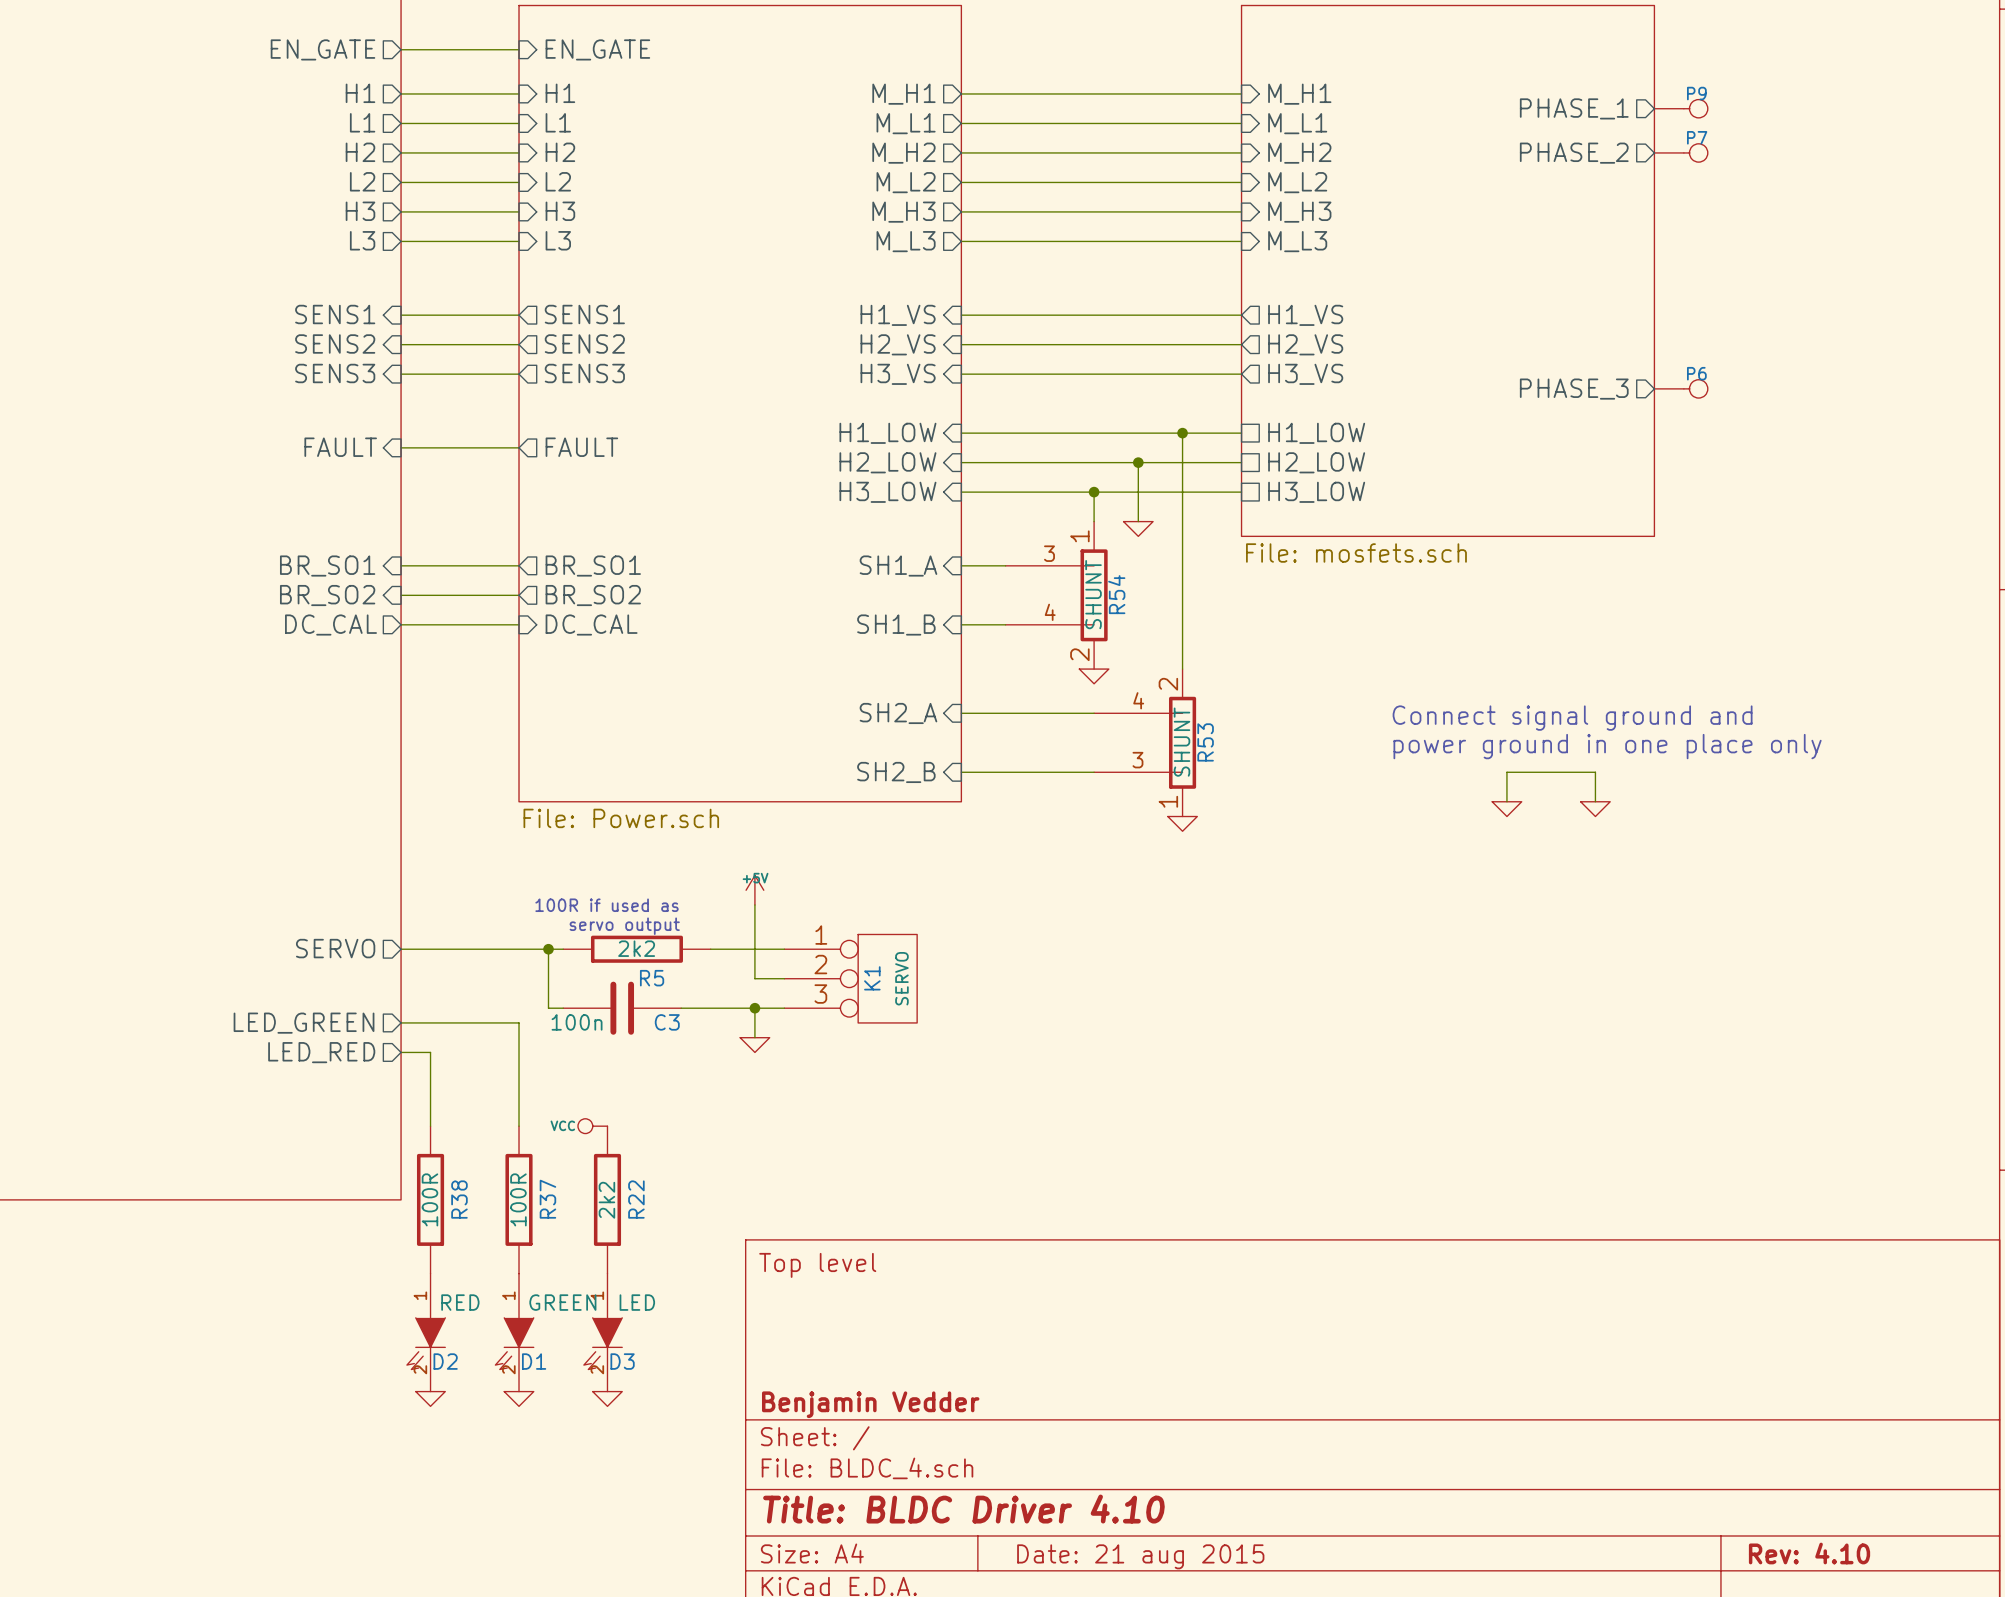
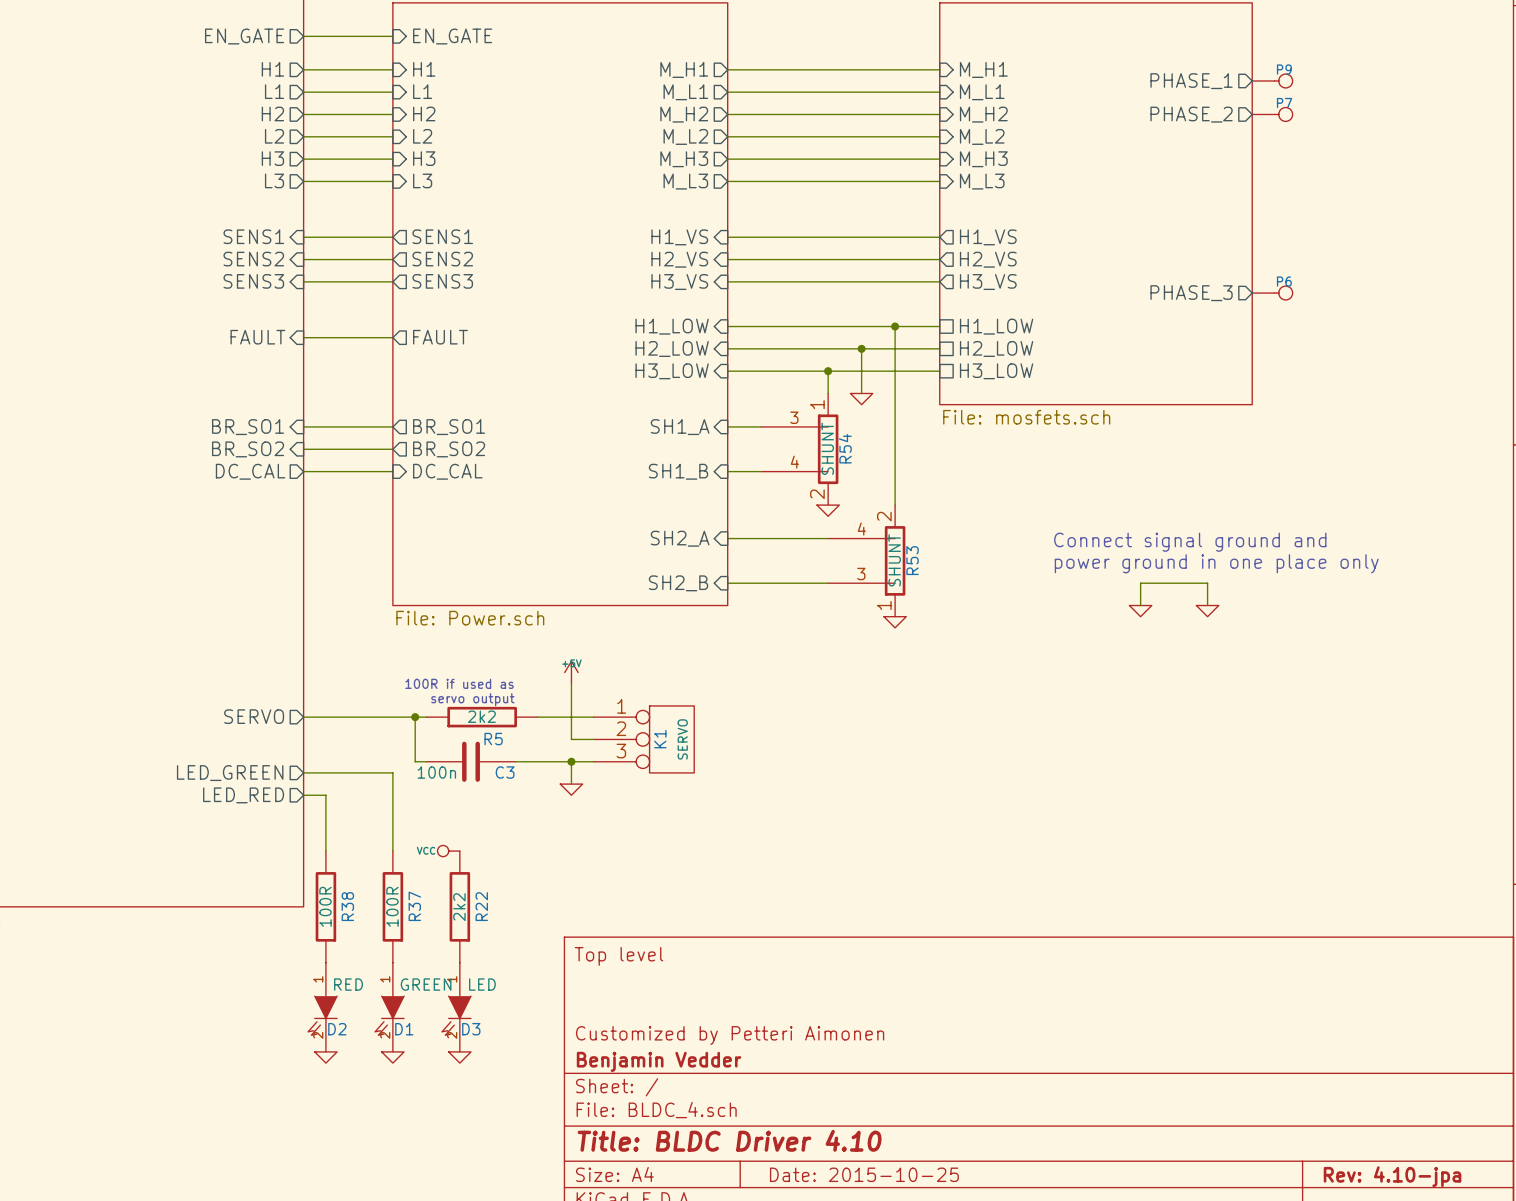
title block: none -> Customized by Petteri Aimonen (730, 1035)
title block: Rev: 4.10 (1809, 1553) -> Rev: 4.10-jpa (1392, 1176)
title block: Date: 21 aug 2015 (1140, 1556) -> Date: 2015-10-25 (864, 1174)

